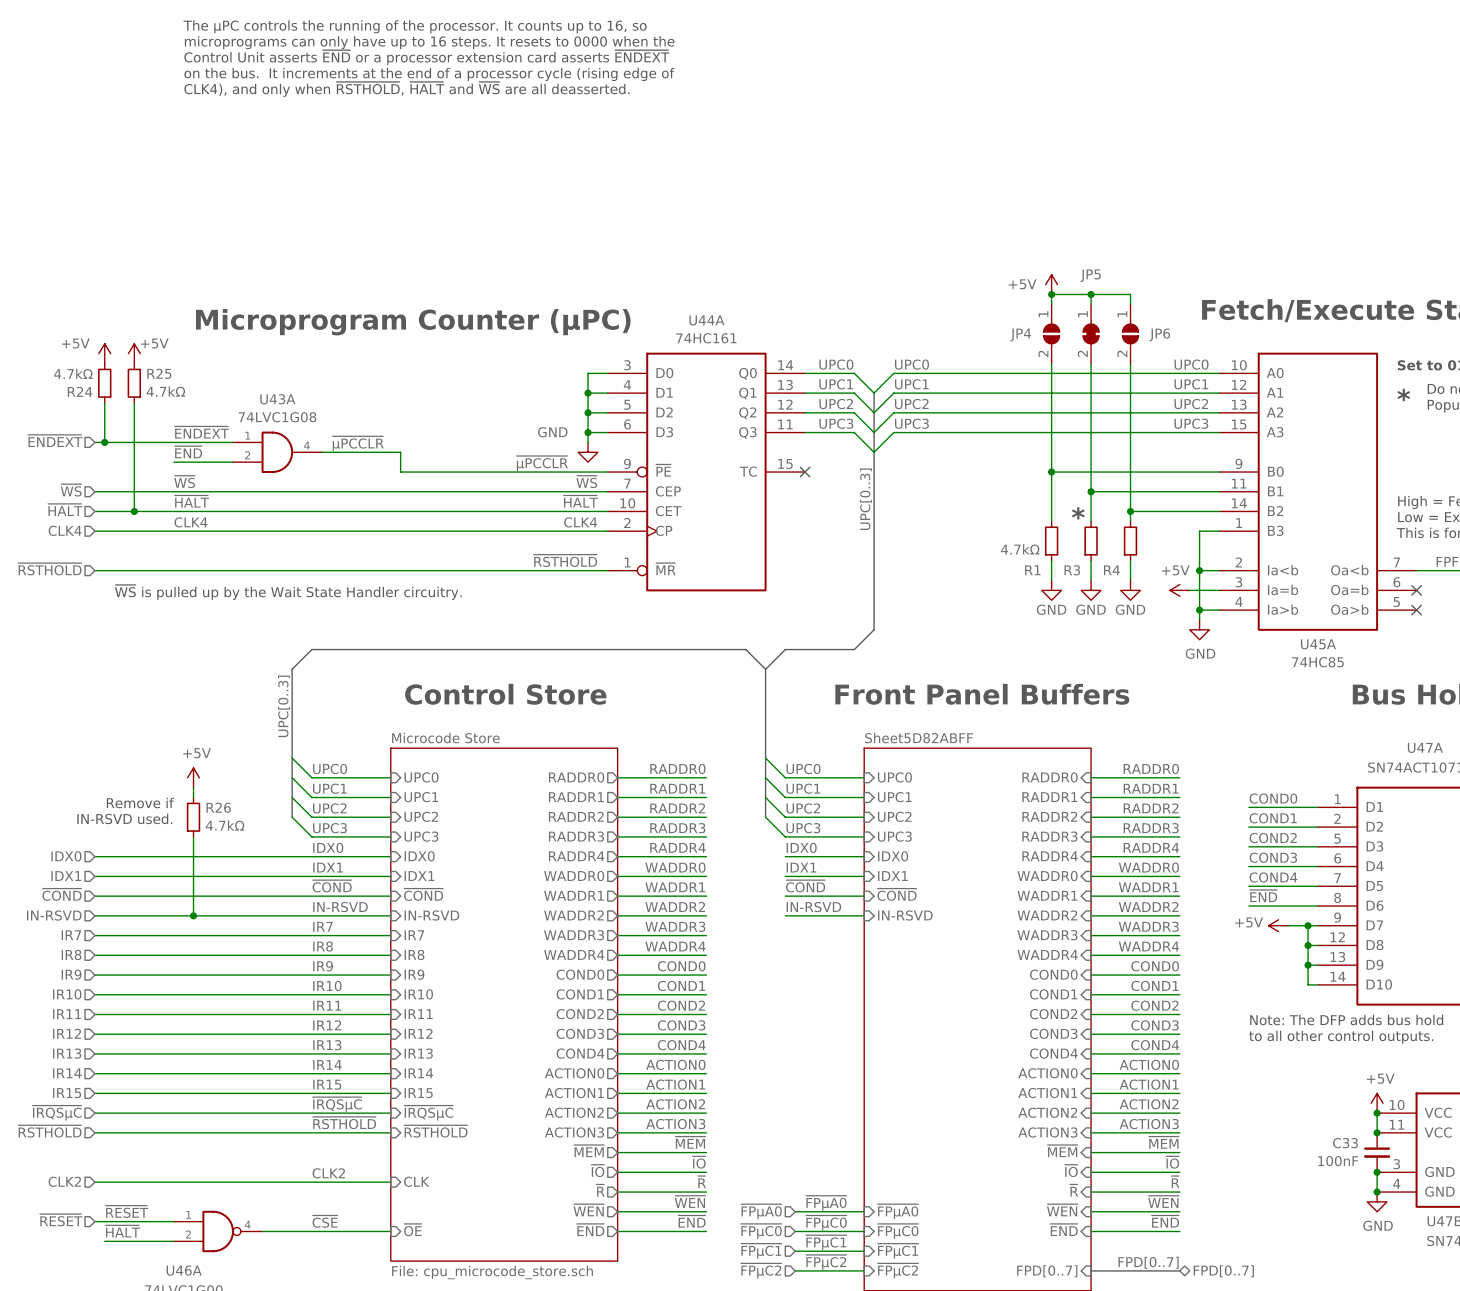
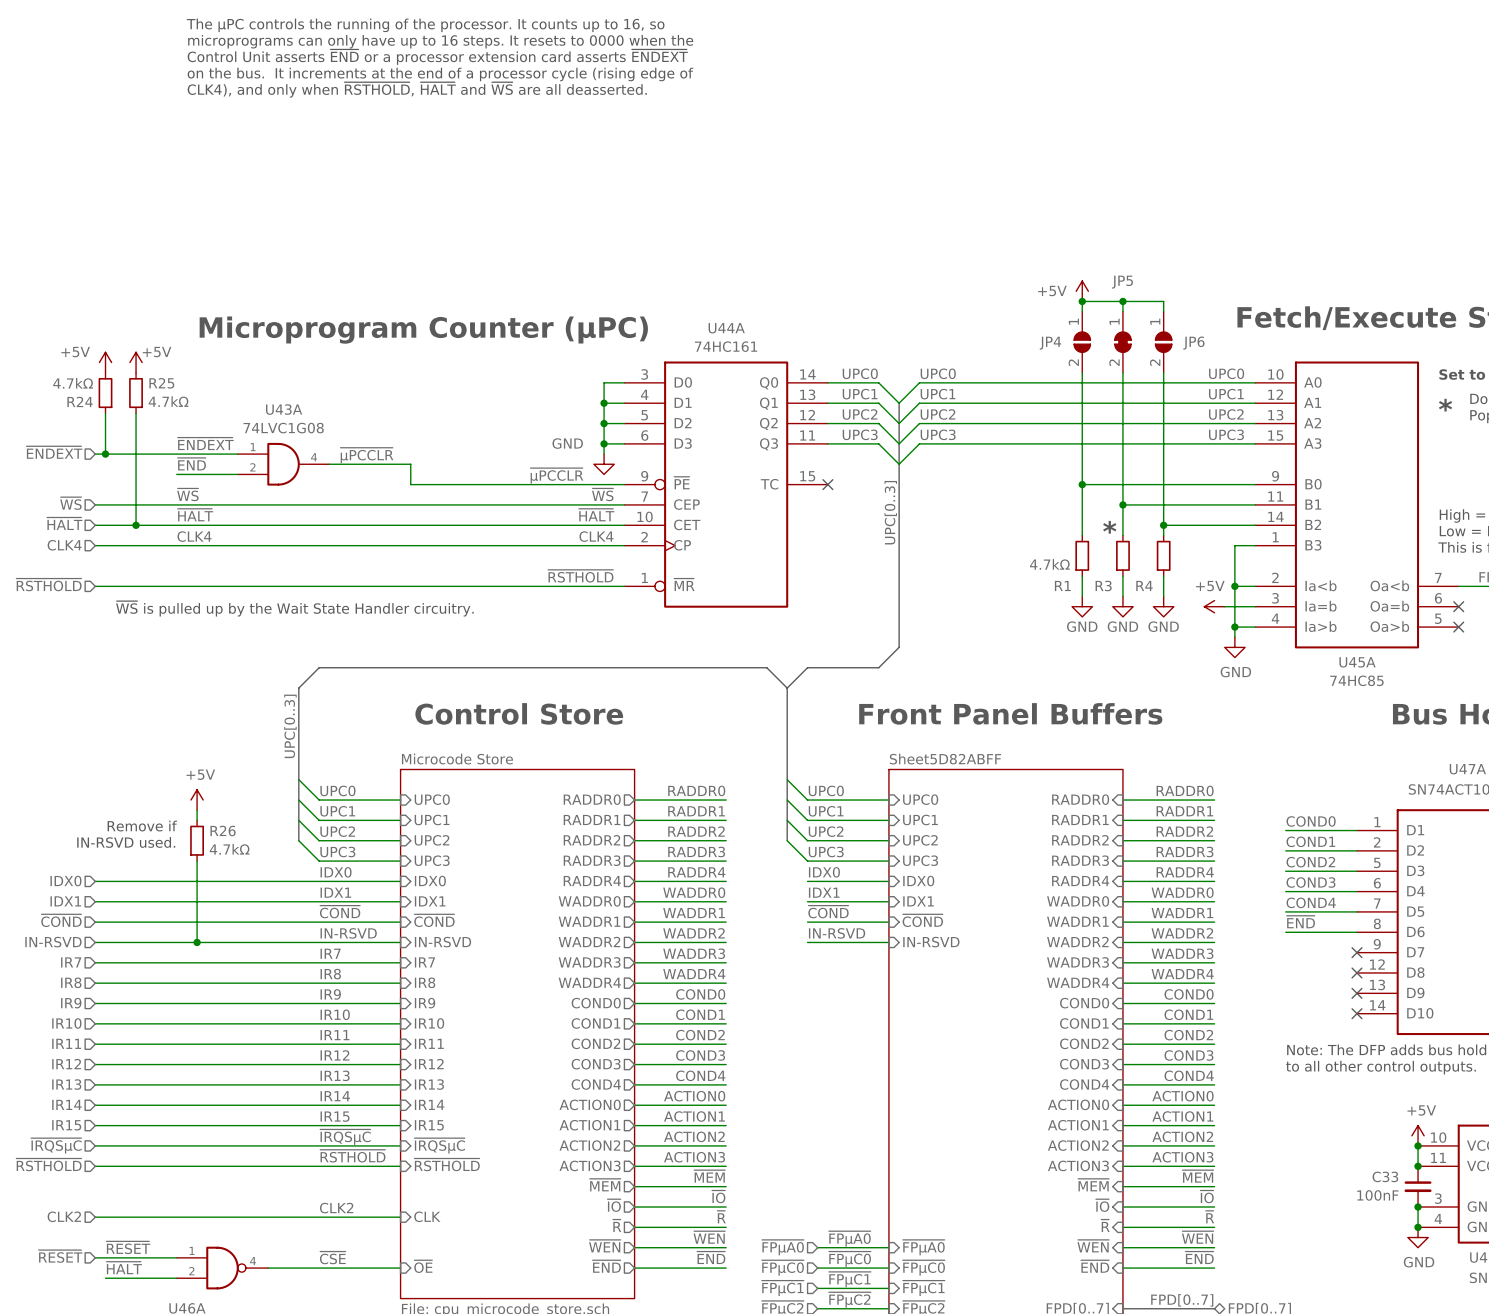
power symbol: +5V (1278, 925) -> none
wire: (1288, 925) (1317, 925) -> none
wire: (1308, 925) (1308, 984) (1317, 984) -> none
junction: (1308, 925) -> none
no-connect mark: none -> (1356, 952)
wire: (1308, 945) (1317, 945) -> none
junction: (1308, 945) -> none
no-connect mark: none -> (1356, 972)
wire: (1308, 965) (1317, 965) -> none
junction: (1308, 965) -> none
no-connect mark: none -> (1356, 993)
no-connect mark: none -> (1356, 1013)

